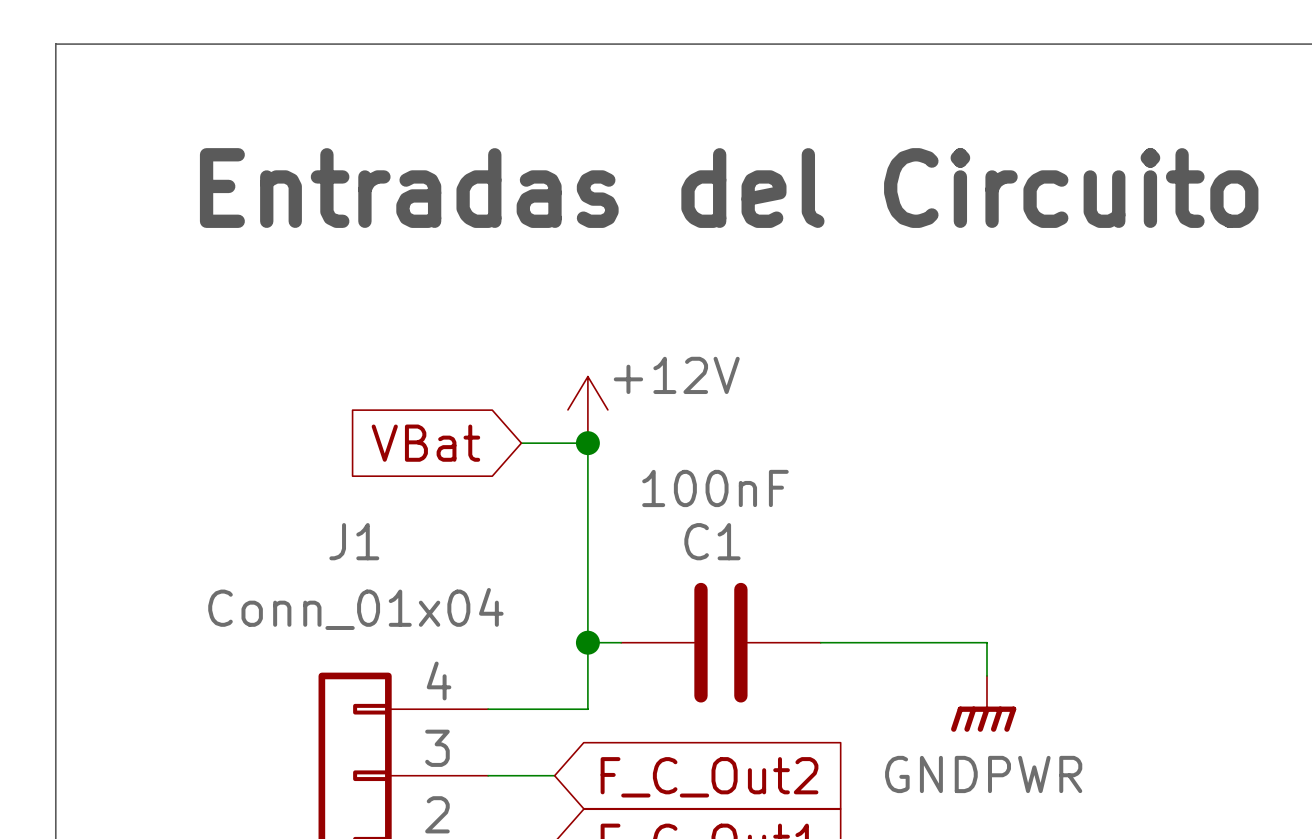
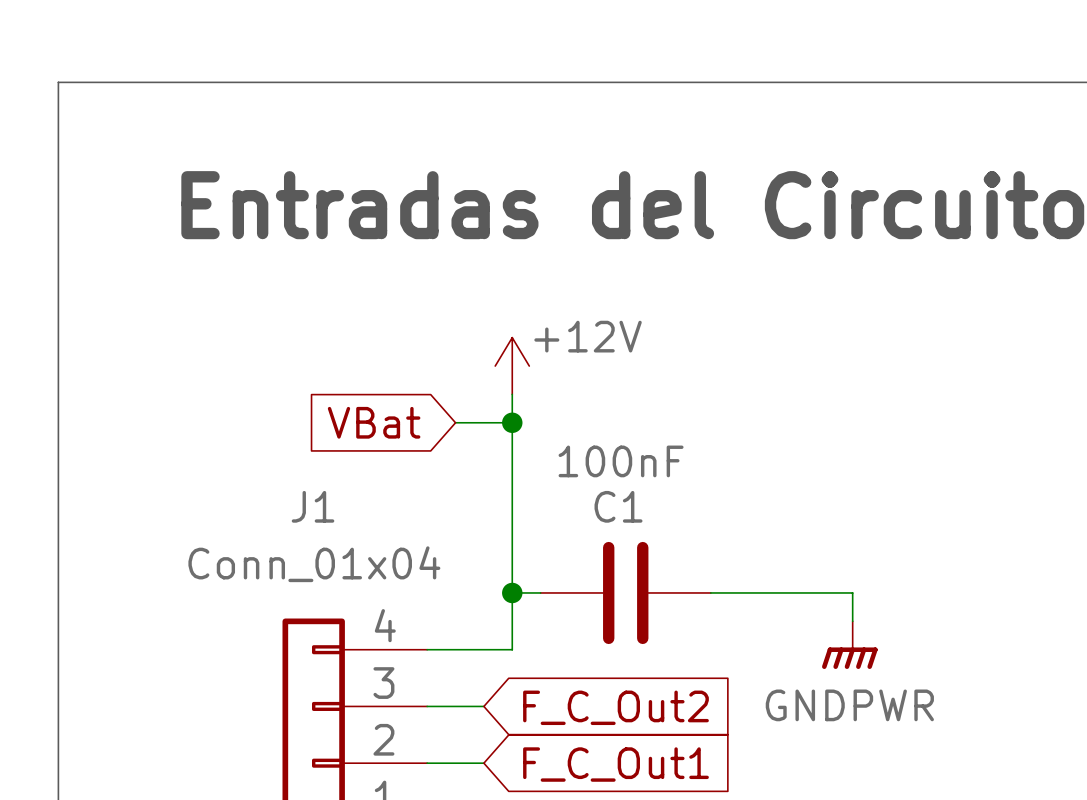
power symbol position: +12V (587, 409) -> +12V (512, 366)

